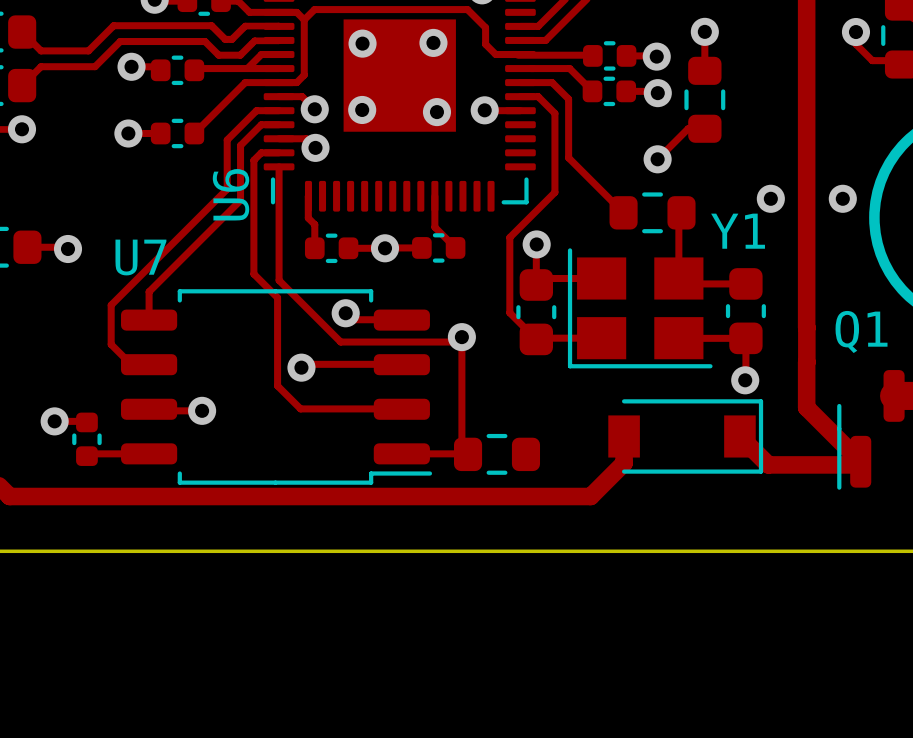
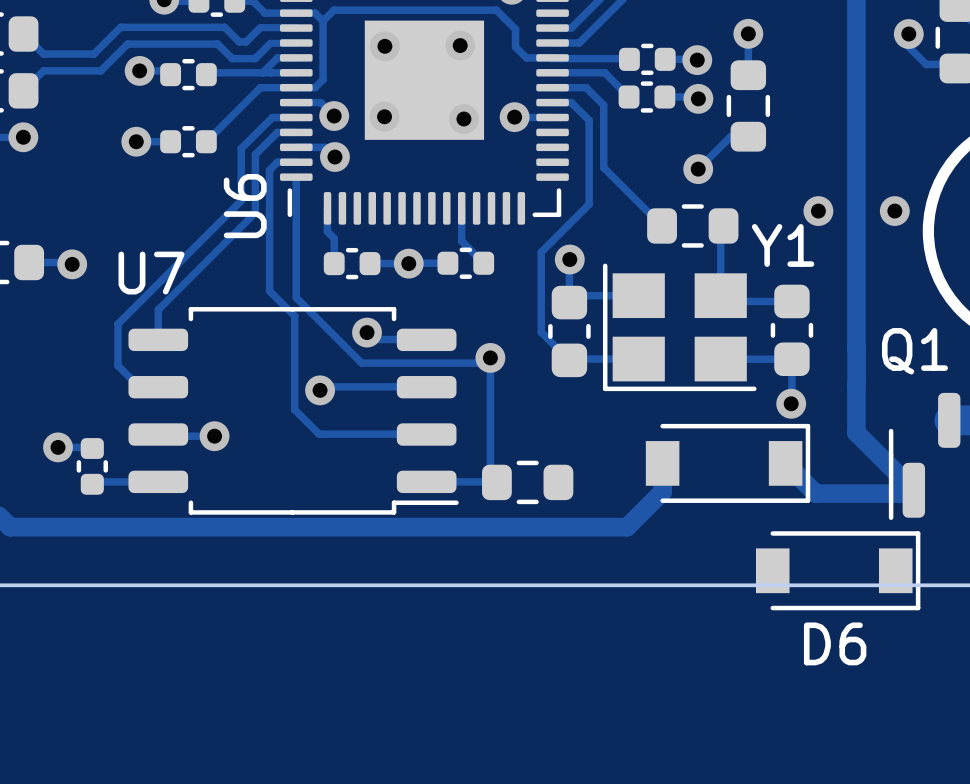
D6: none -> (838, 570)

